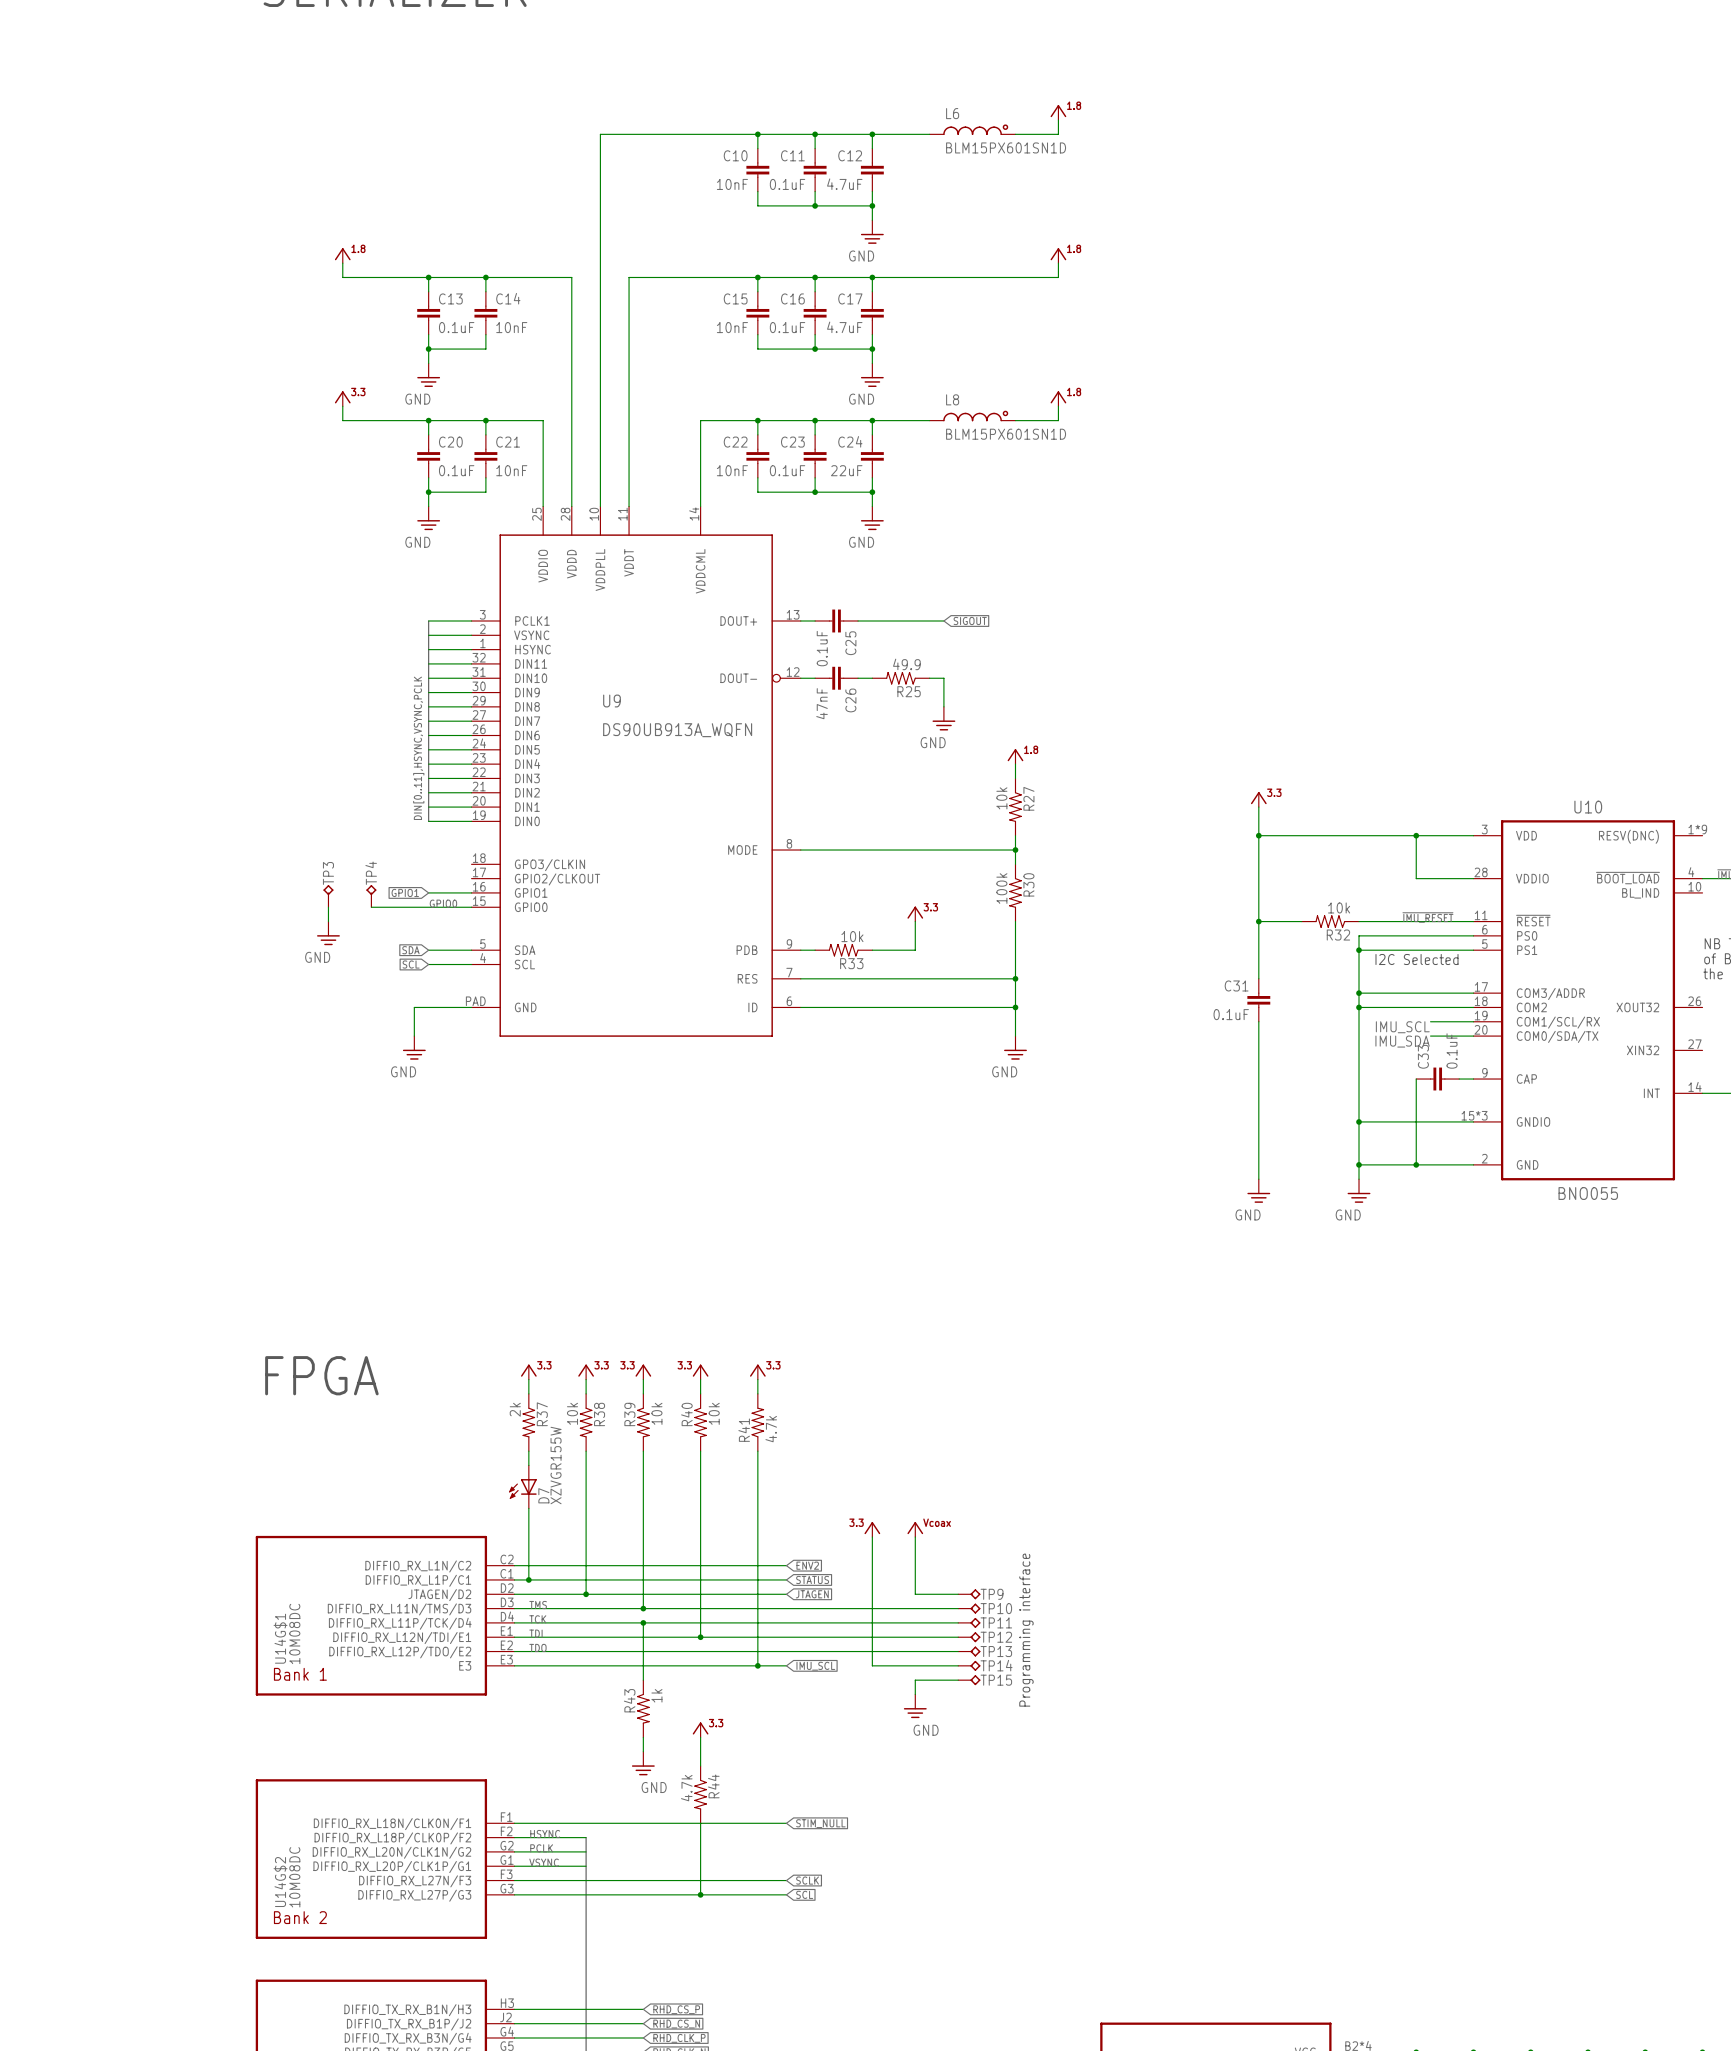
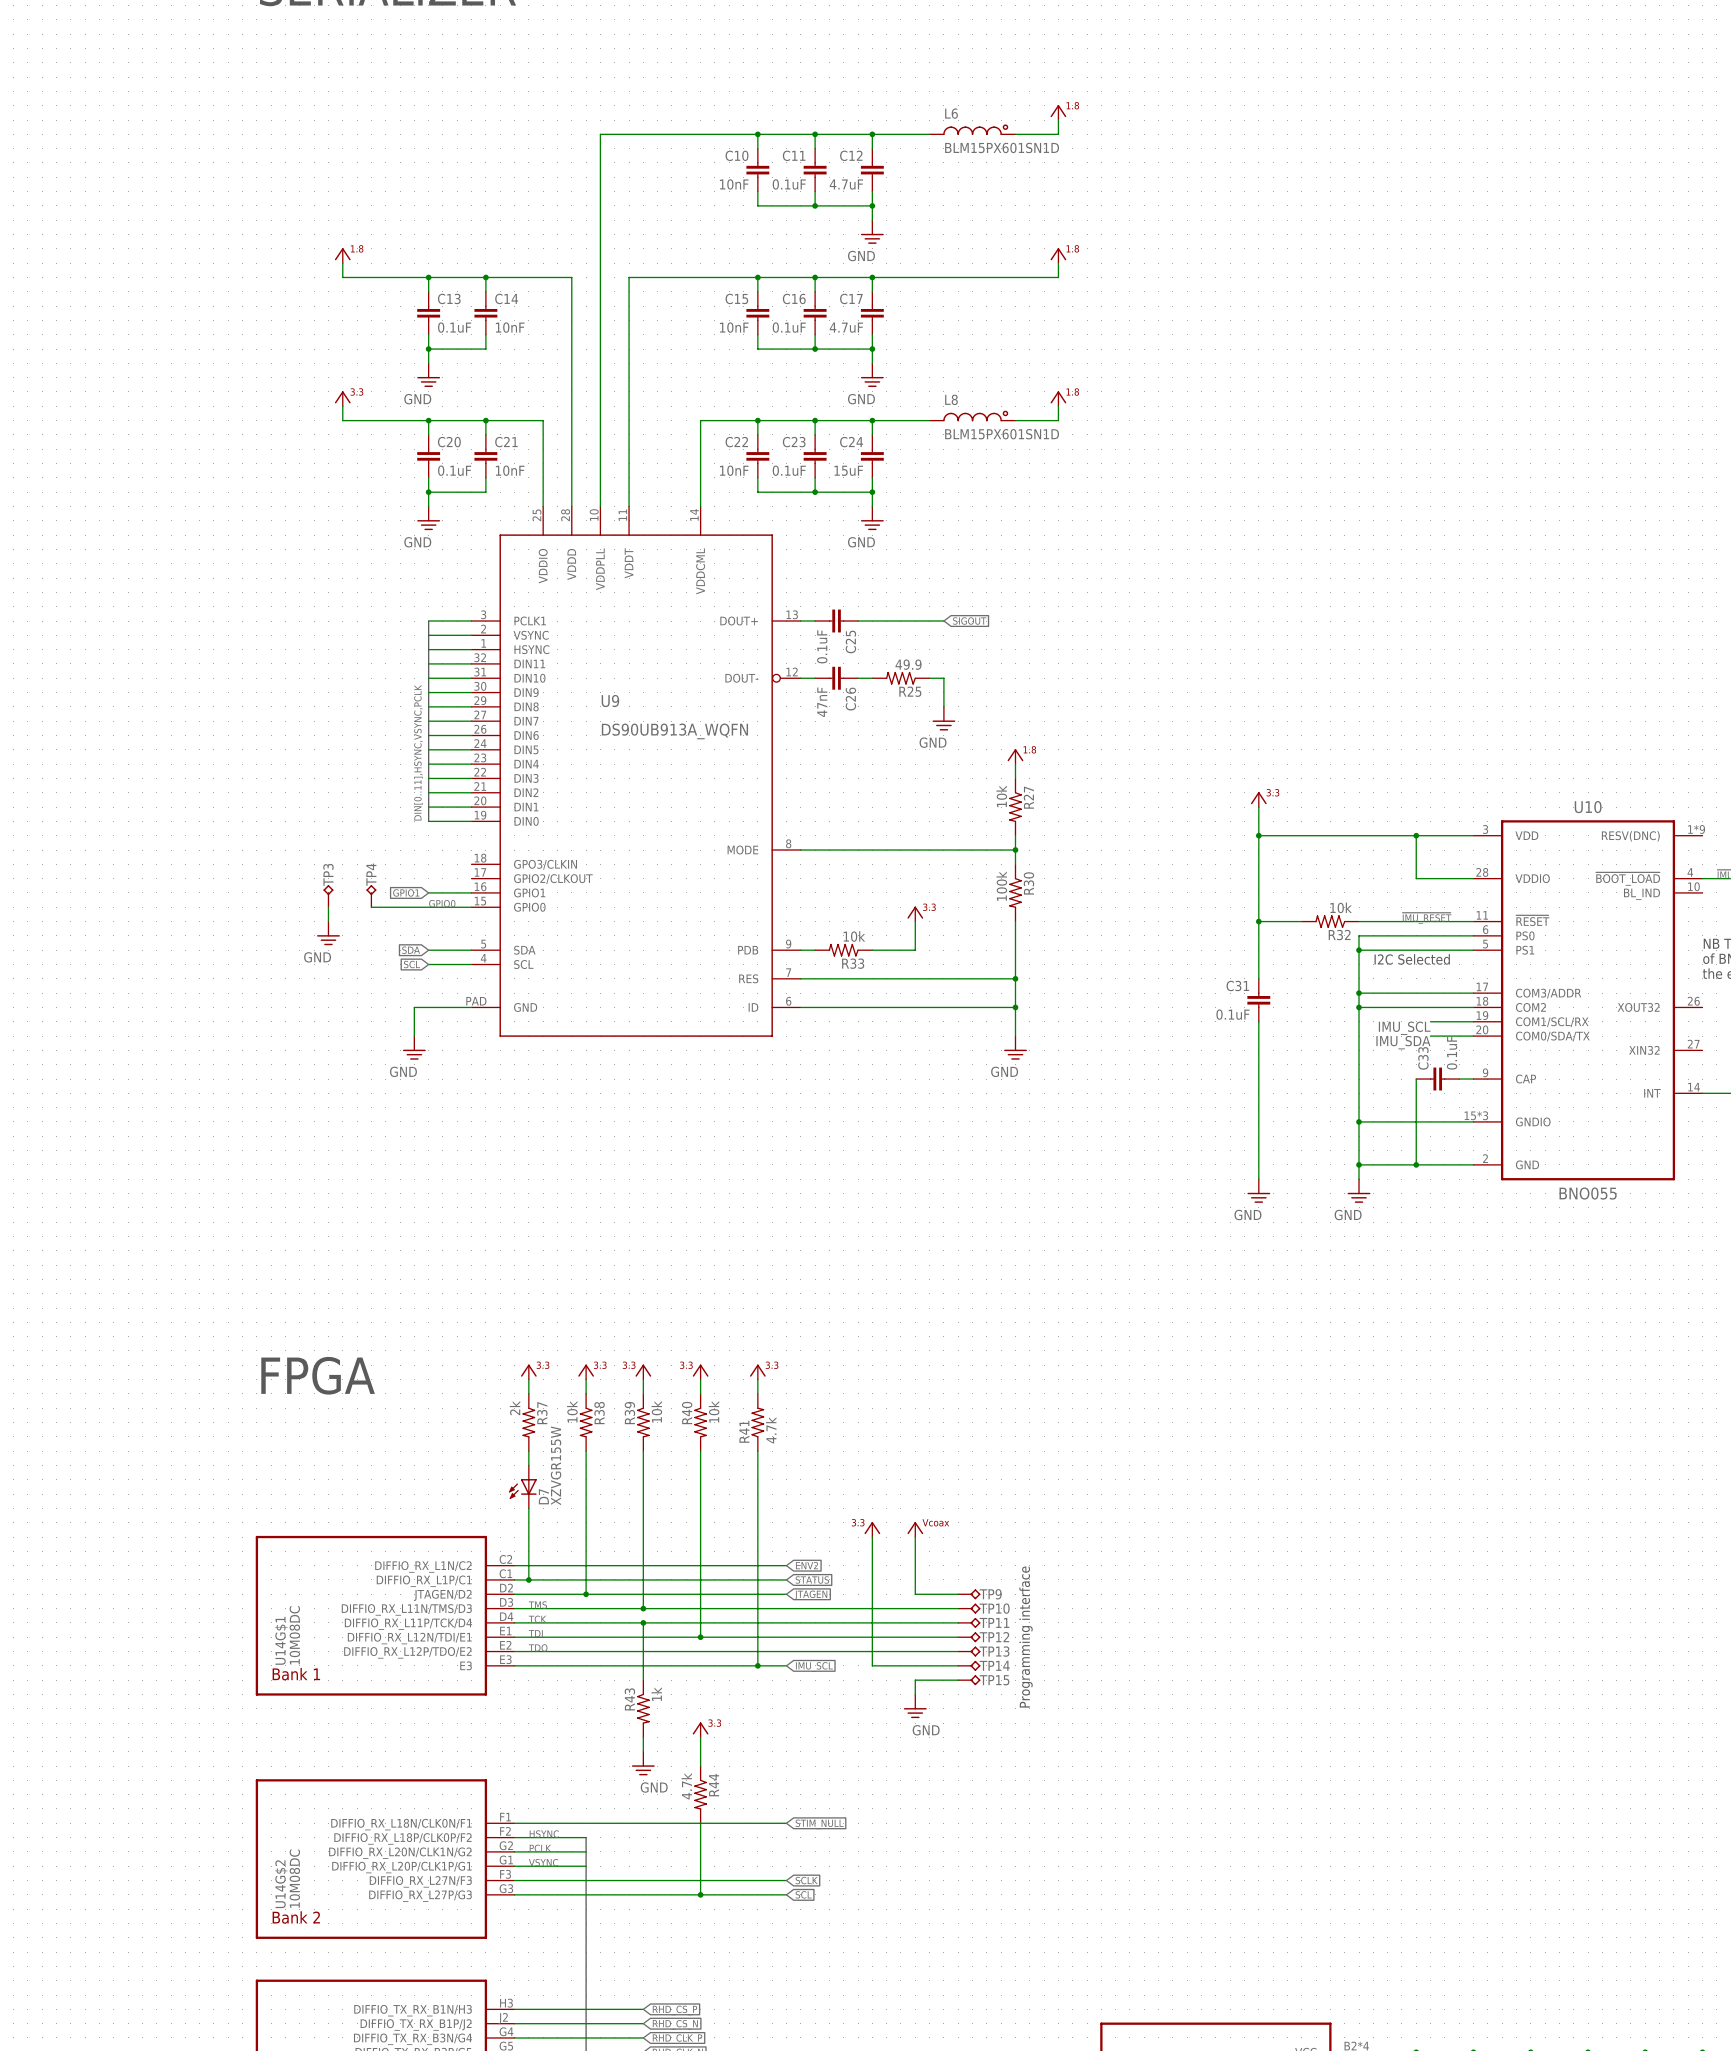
C24 value: 22uF (846, 470) -> 15uF (848, 470)

